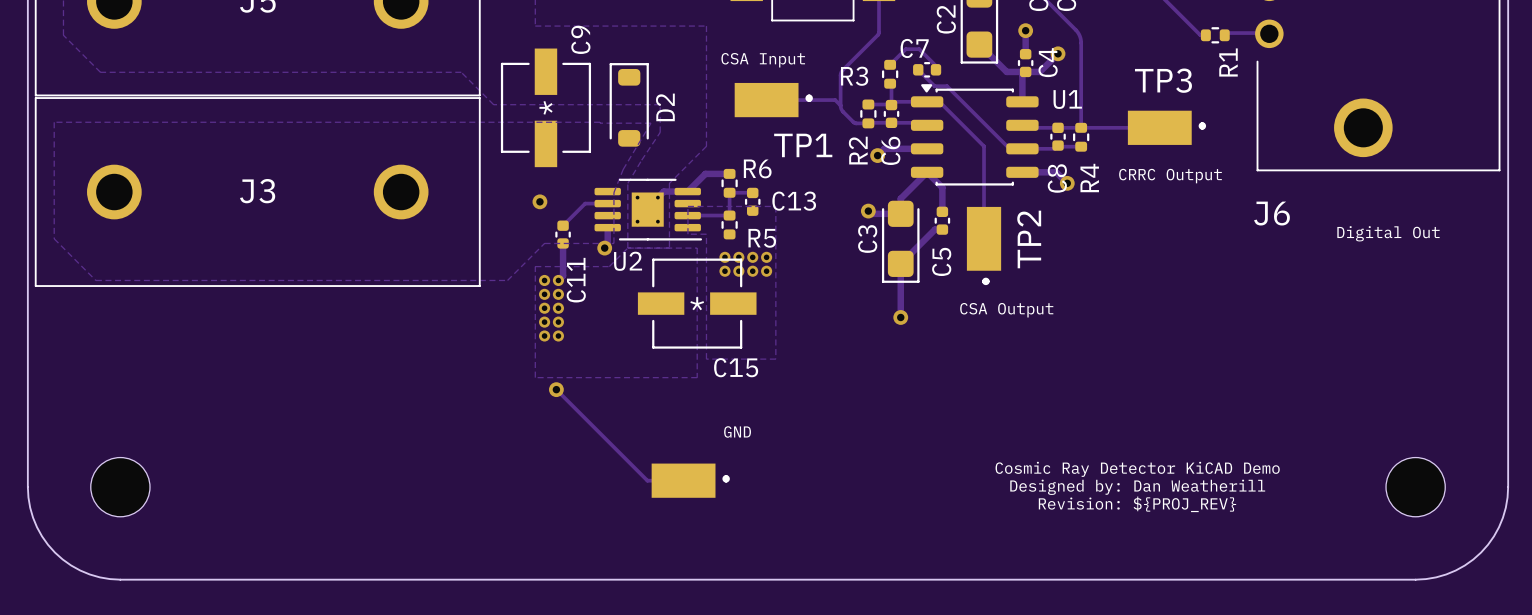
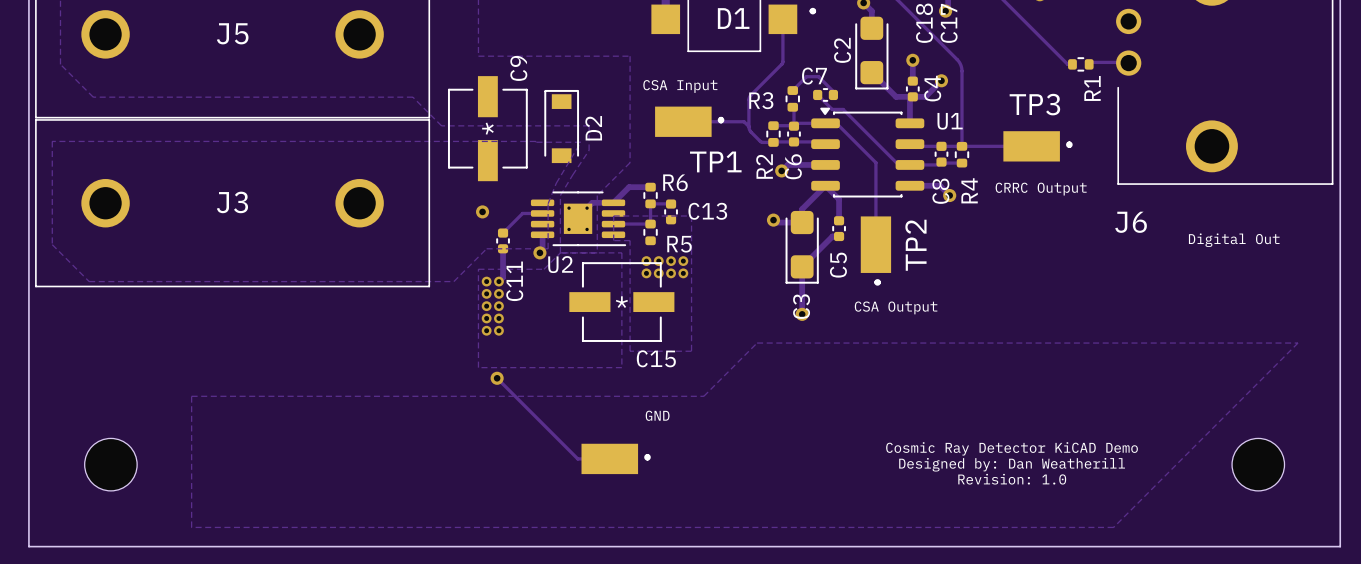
D2 footprint: [609, 63, 649, 147] -> [544, 89, 580, 164]
C3 name position: C3 (867, 239) -> C3 (801, 306)
zone outline: none -> (757, 343) (703, 396) (191, 396) (191, 527) (1113, 527) (1298, 343) (757, 343)
board edge: (27, 487) (30, 507) (37, 527) (54, 552) (80, 570) (99, 577) (120, 579) -> (28, 464) (28, 546) (110, 546)
board edge: (1508, 487) (1505, 507) (1498, 527) (1481, 552) (1455, 570) (1436, 577) (1415, 579) -> (1340, 464) (1340, 546) (1258, 546)
text: Revision: ${PROJ_REV} (1137, 504) -> Revision: 1.0 (1012, 479)

